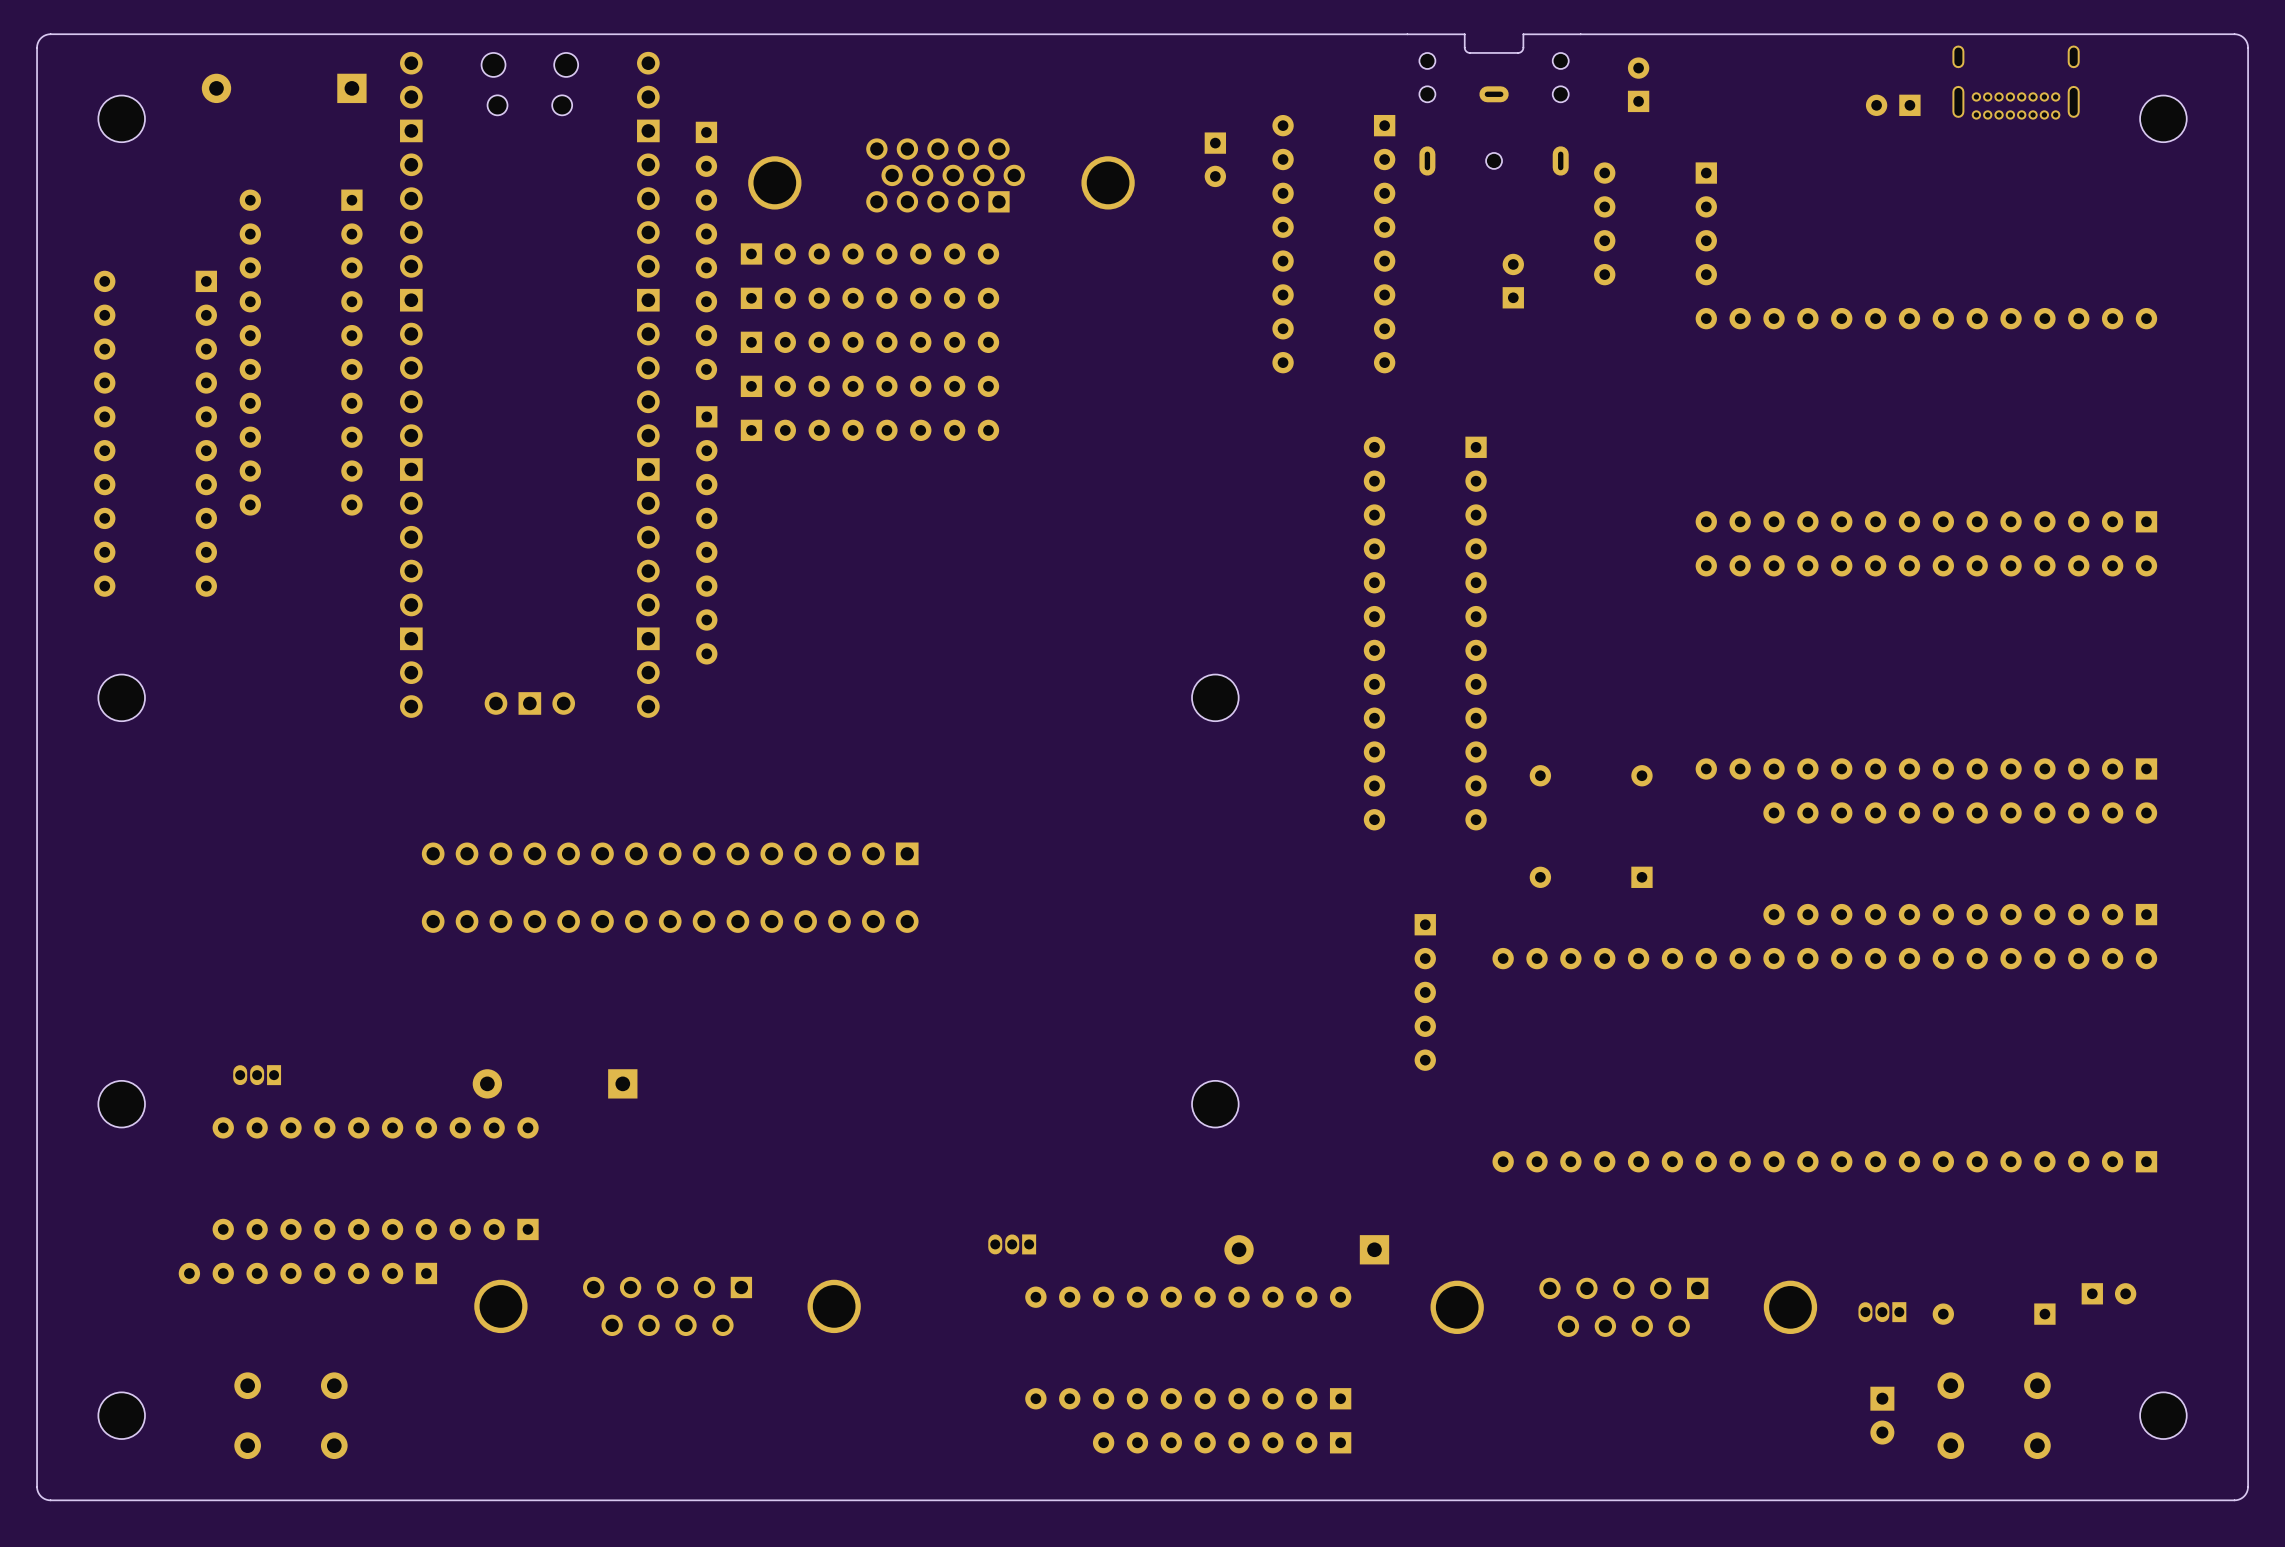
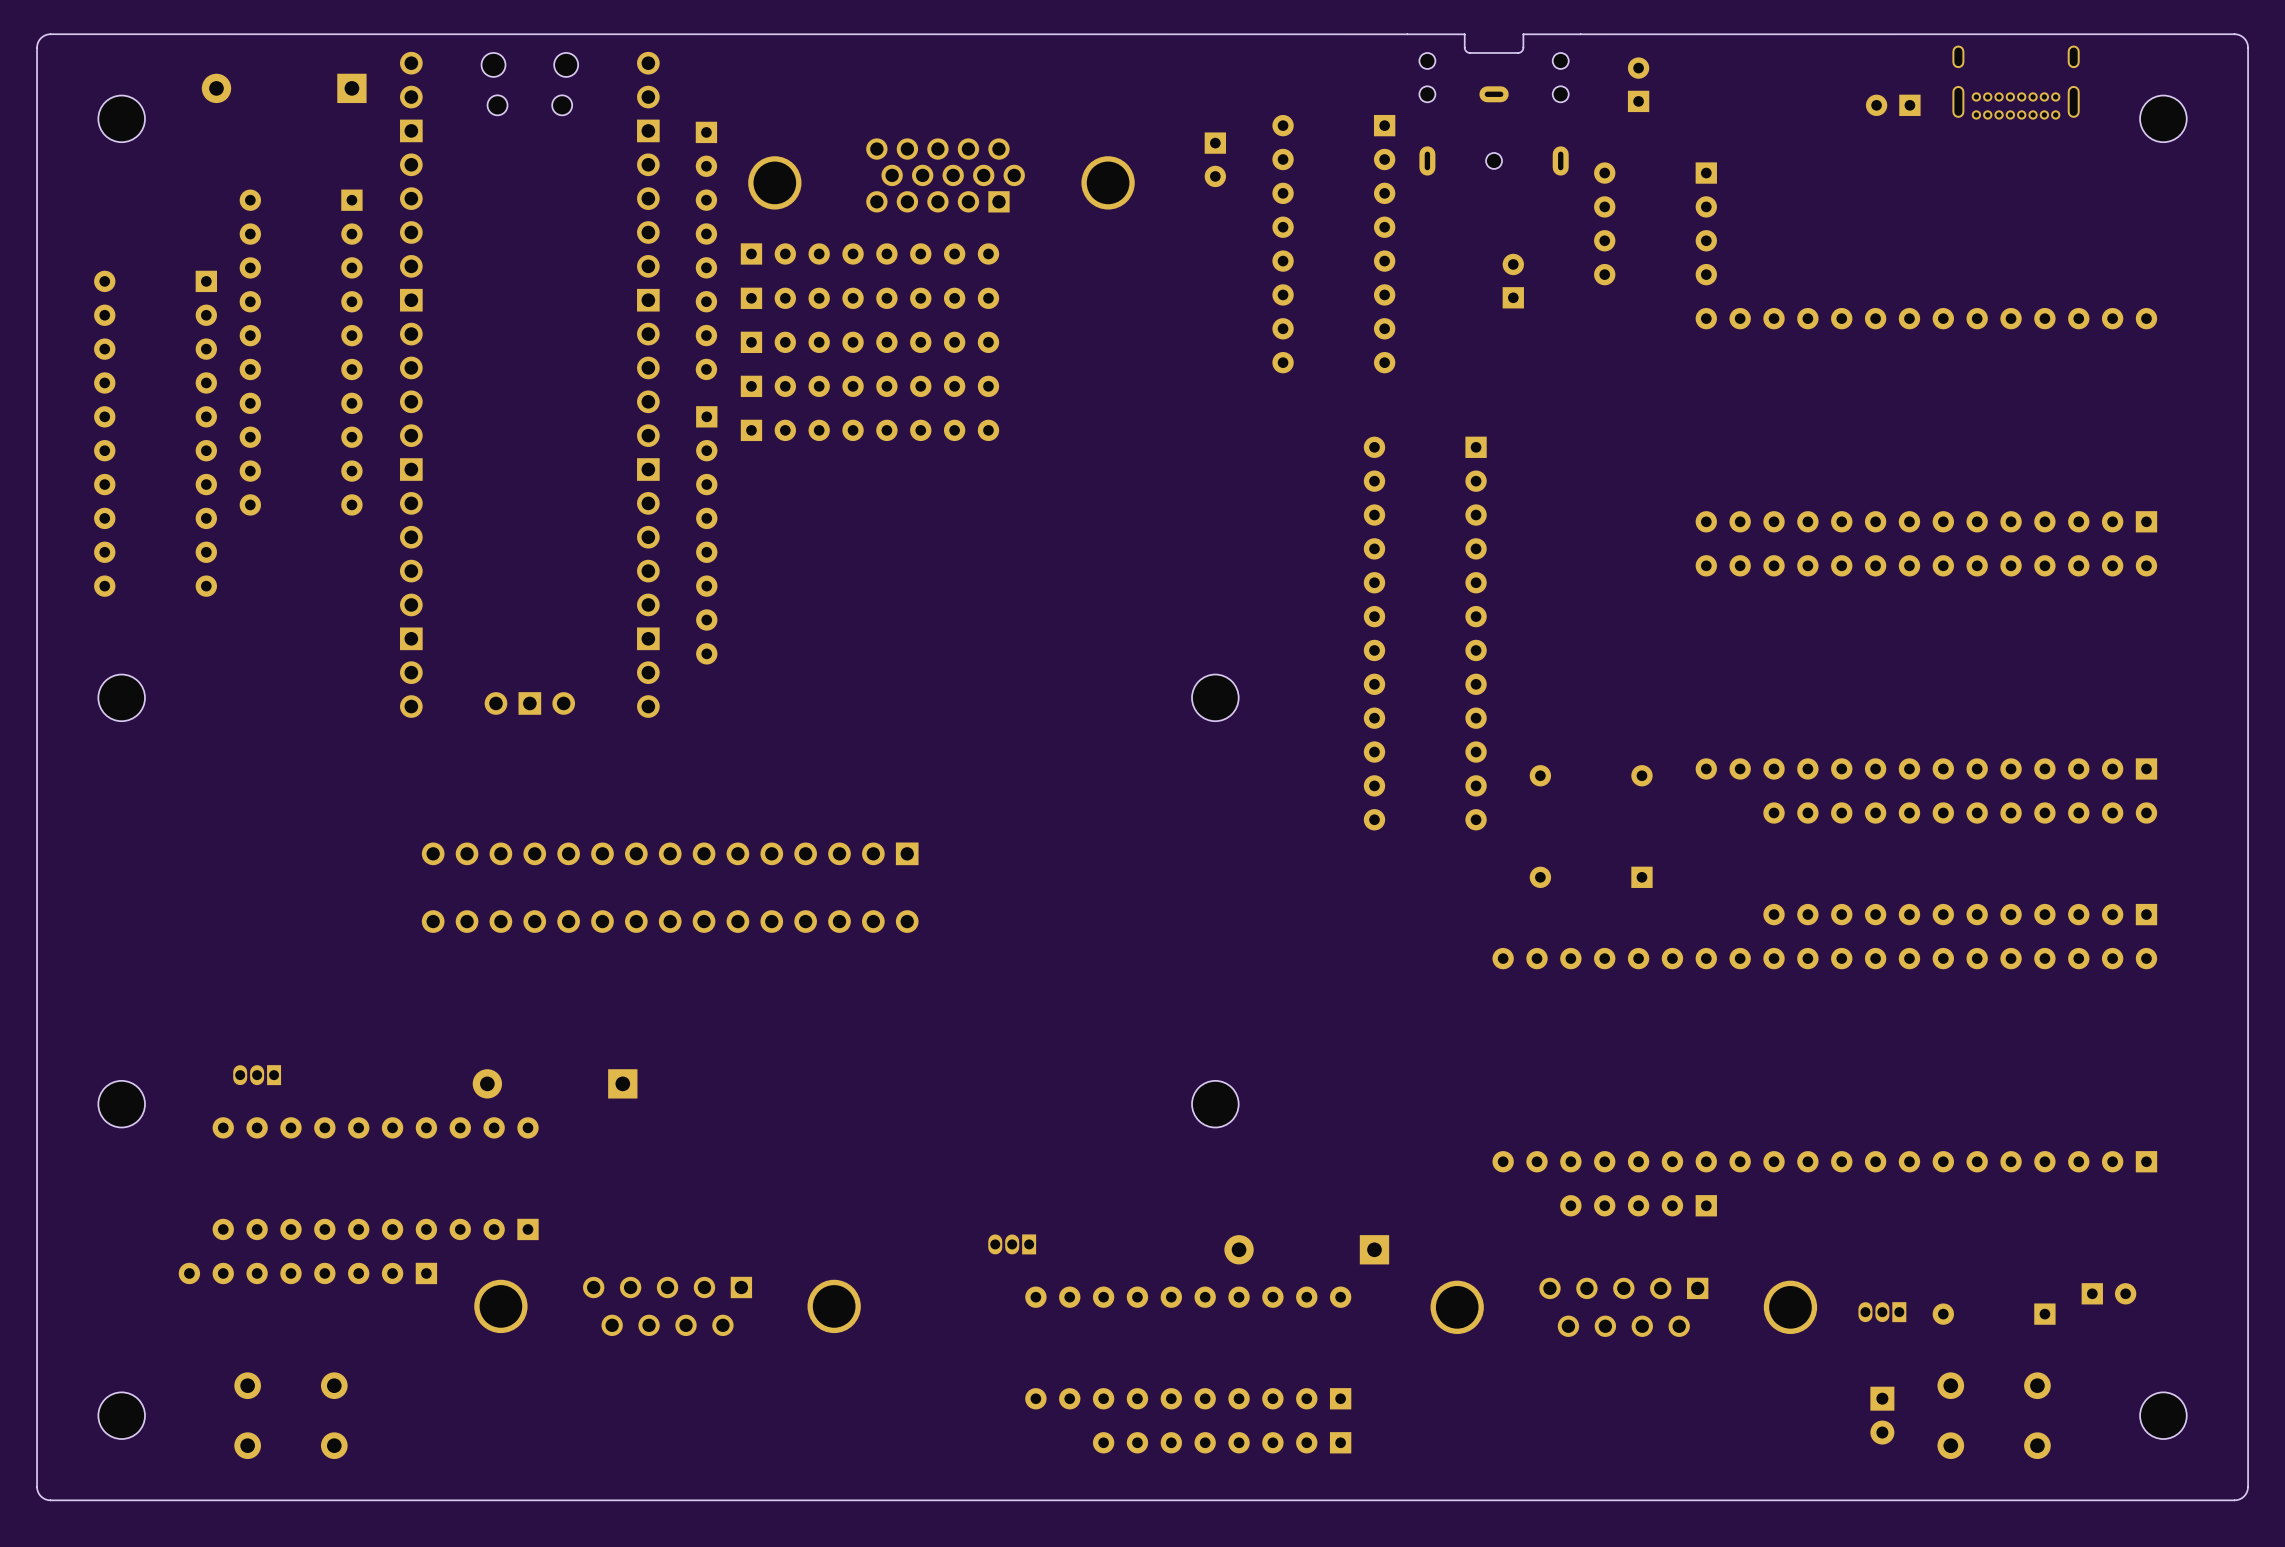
part rotation: 0° (1425, 992) -> 90° clockwise (1638, 1205)
part position: (1425, 992) -> (1638, 1205)

